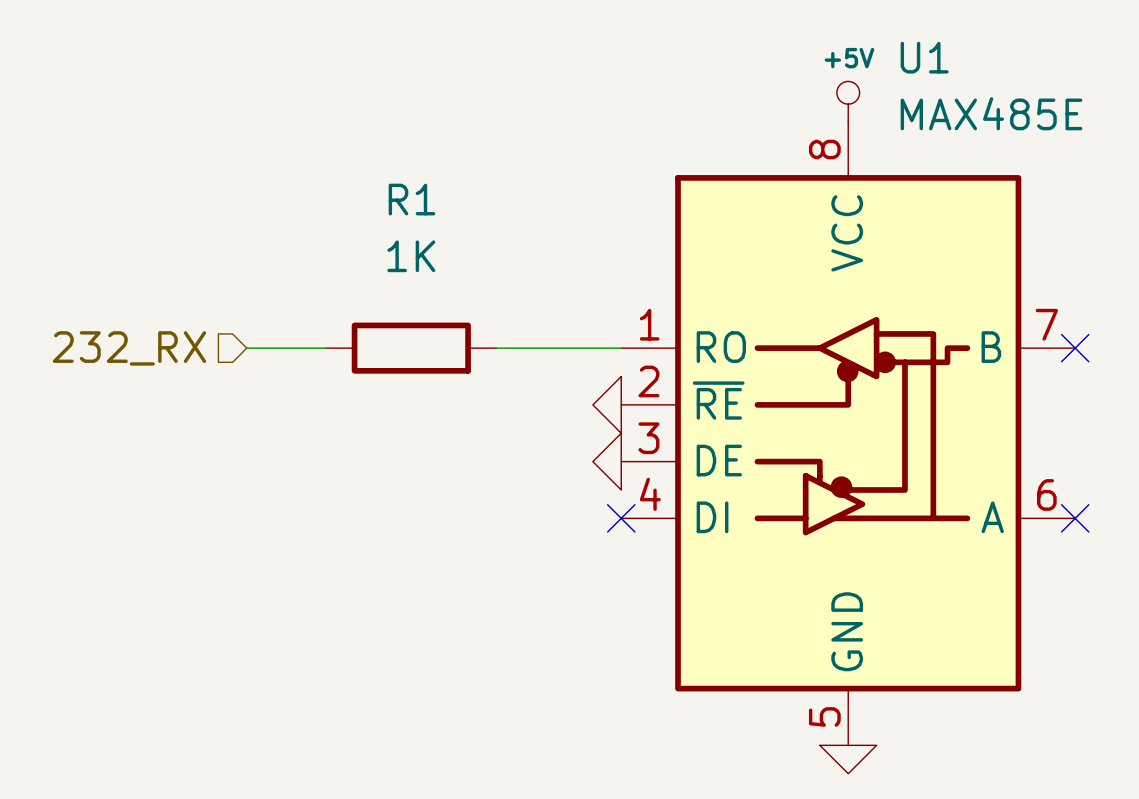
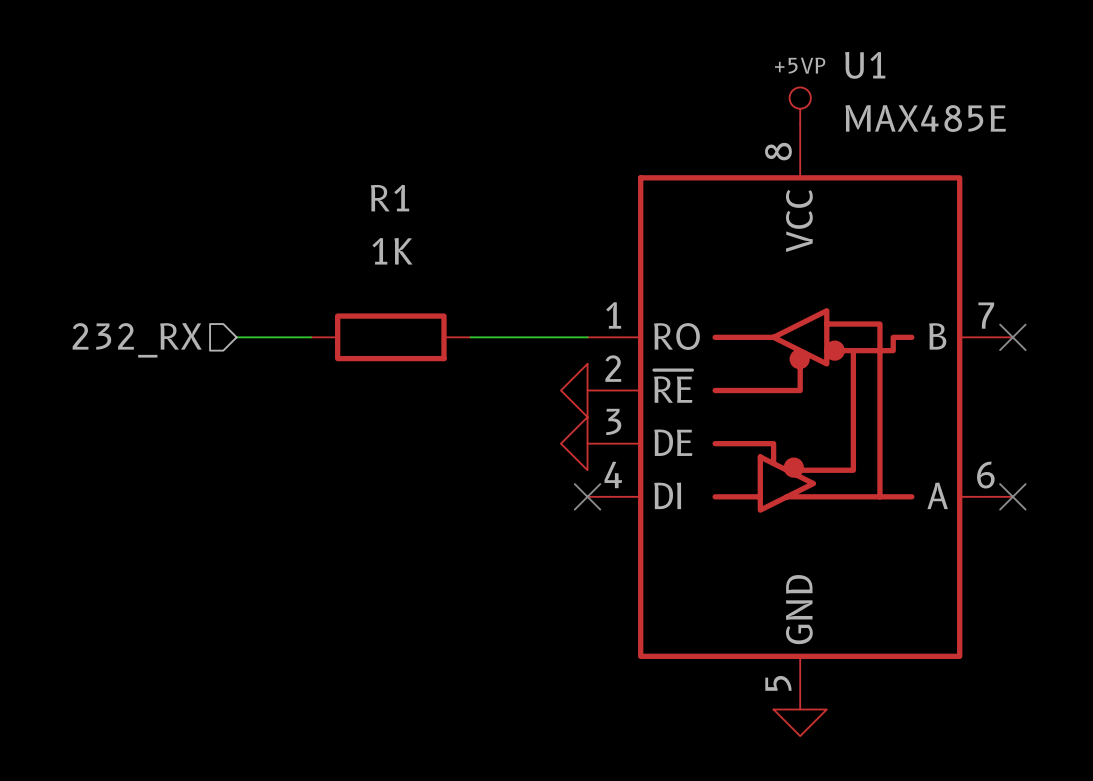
power symbol: +5V (848, 101) -> +5VP (800, 106)

